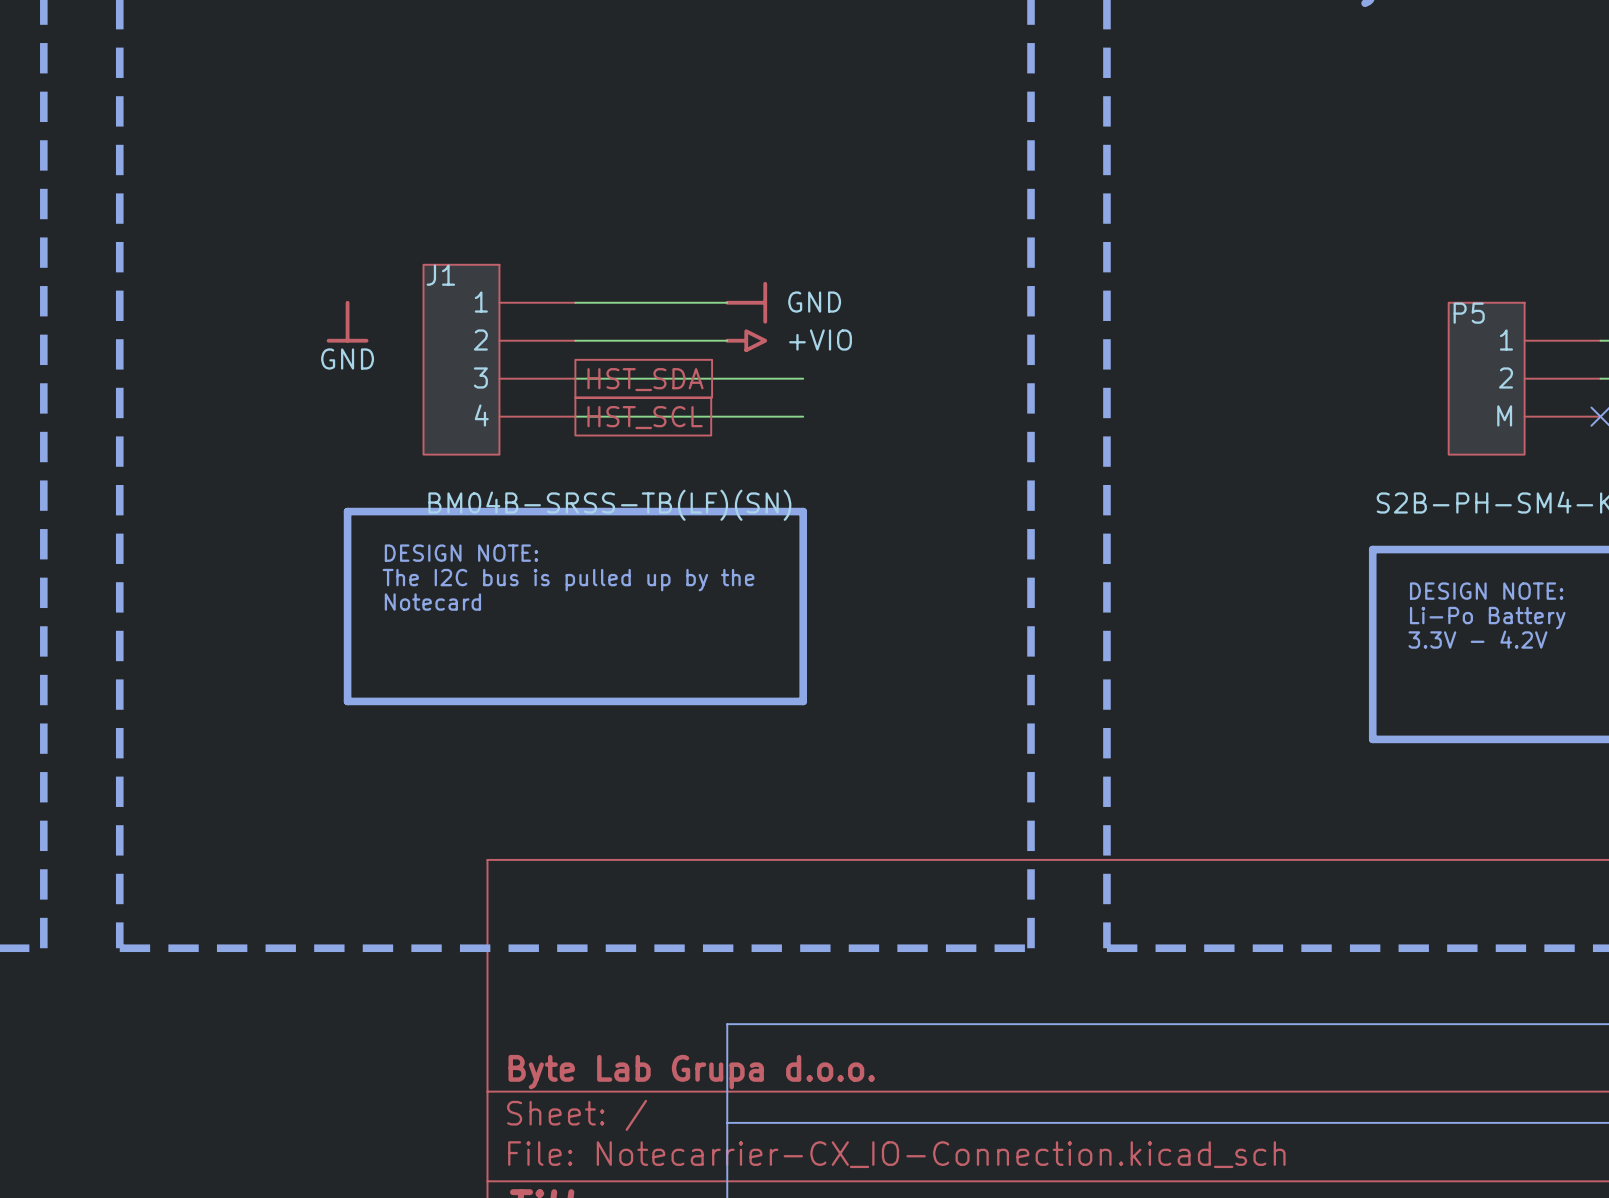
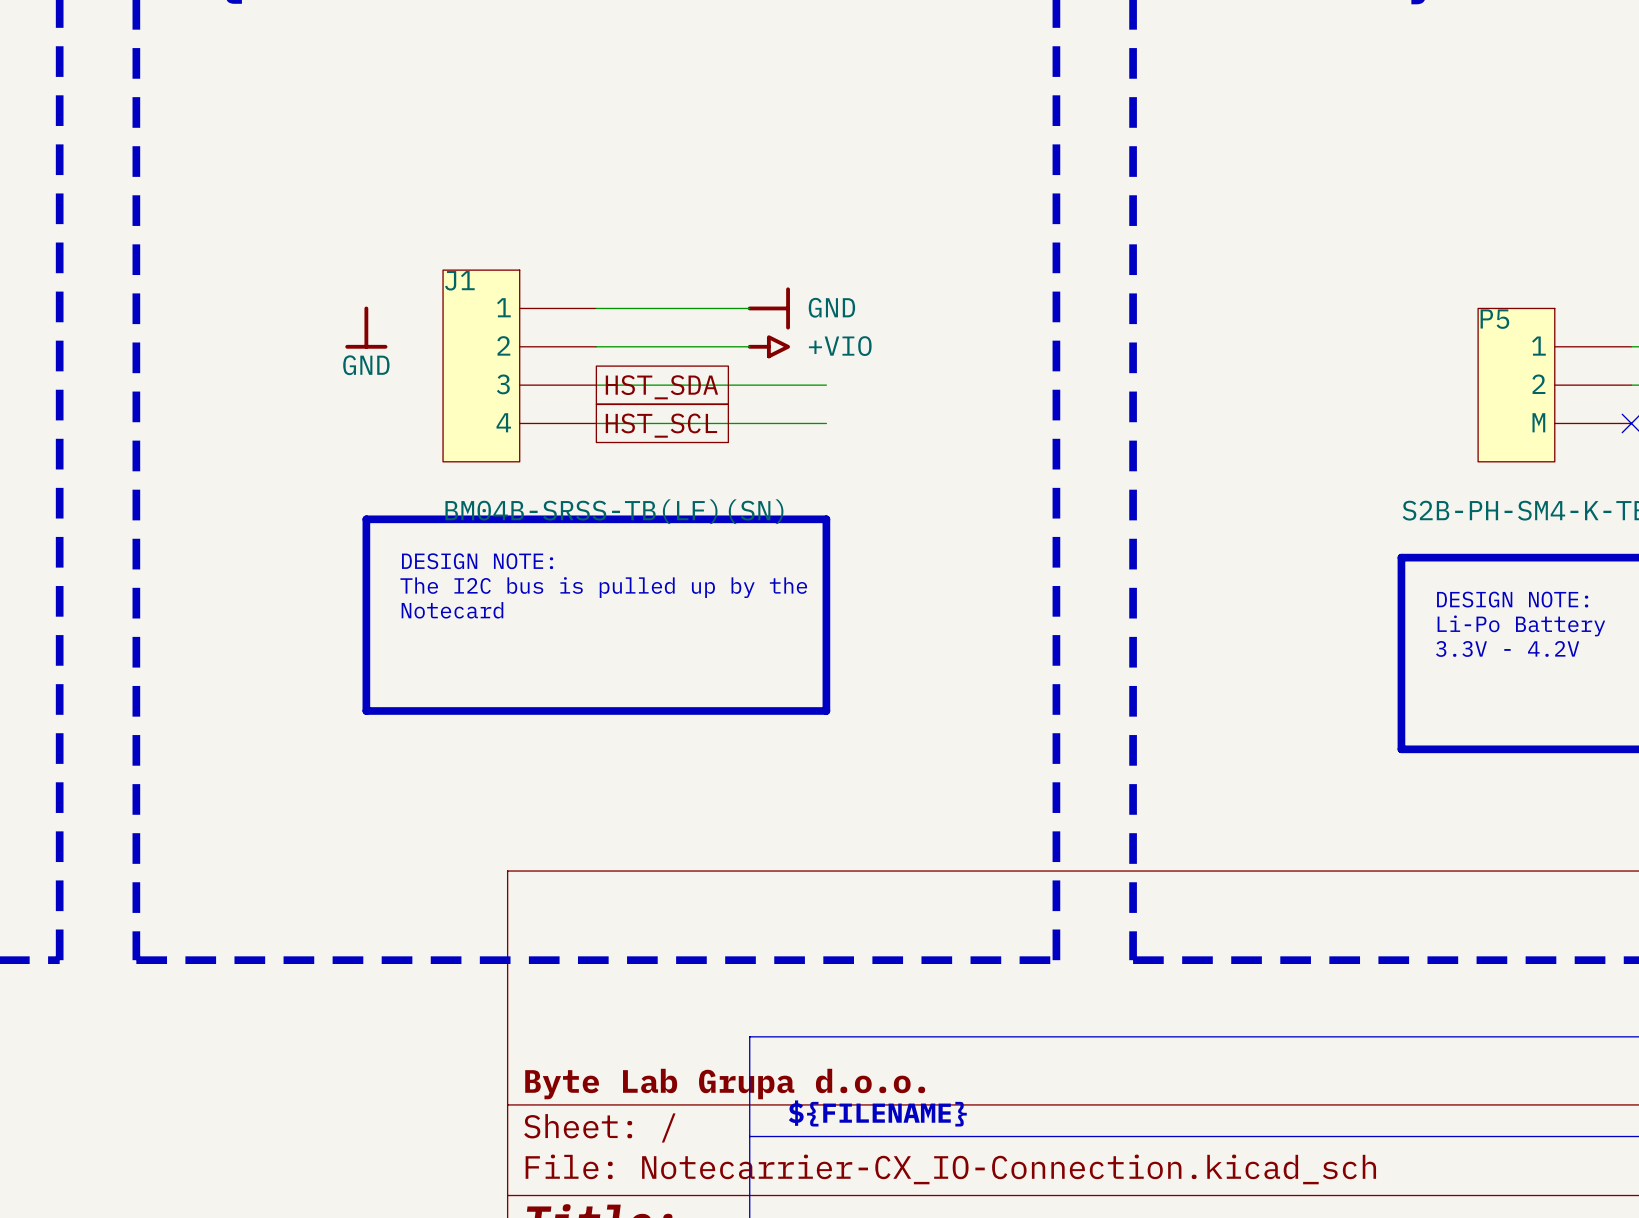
text: none -> ${FILENAME} (877, 1113)

